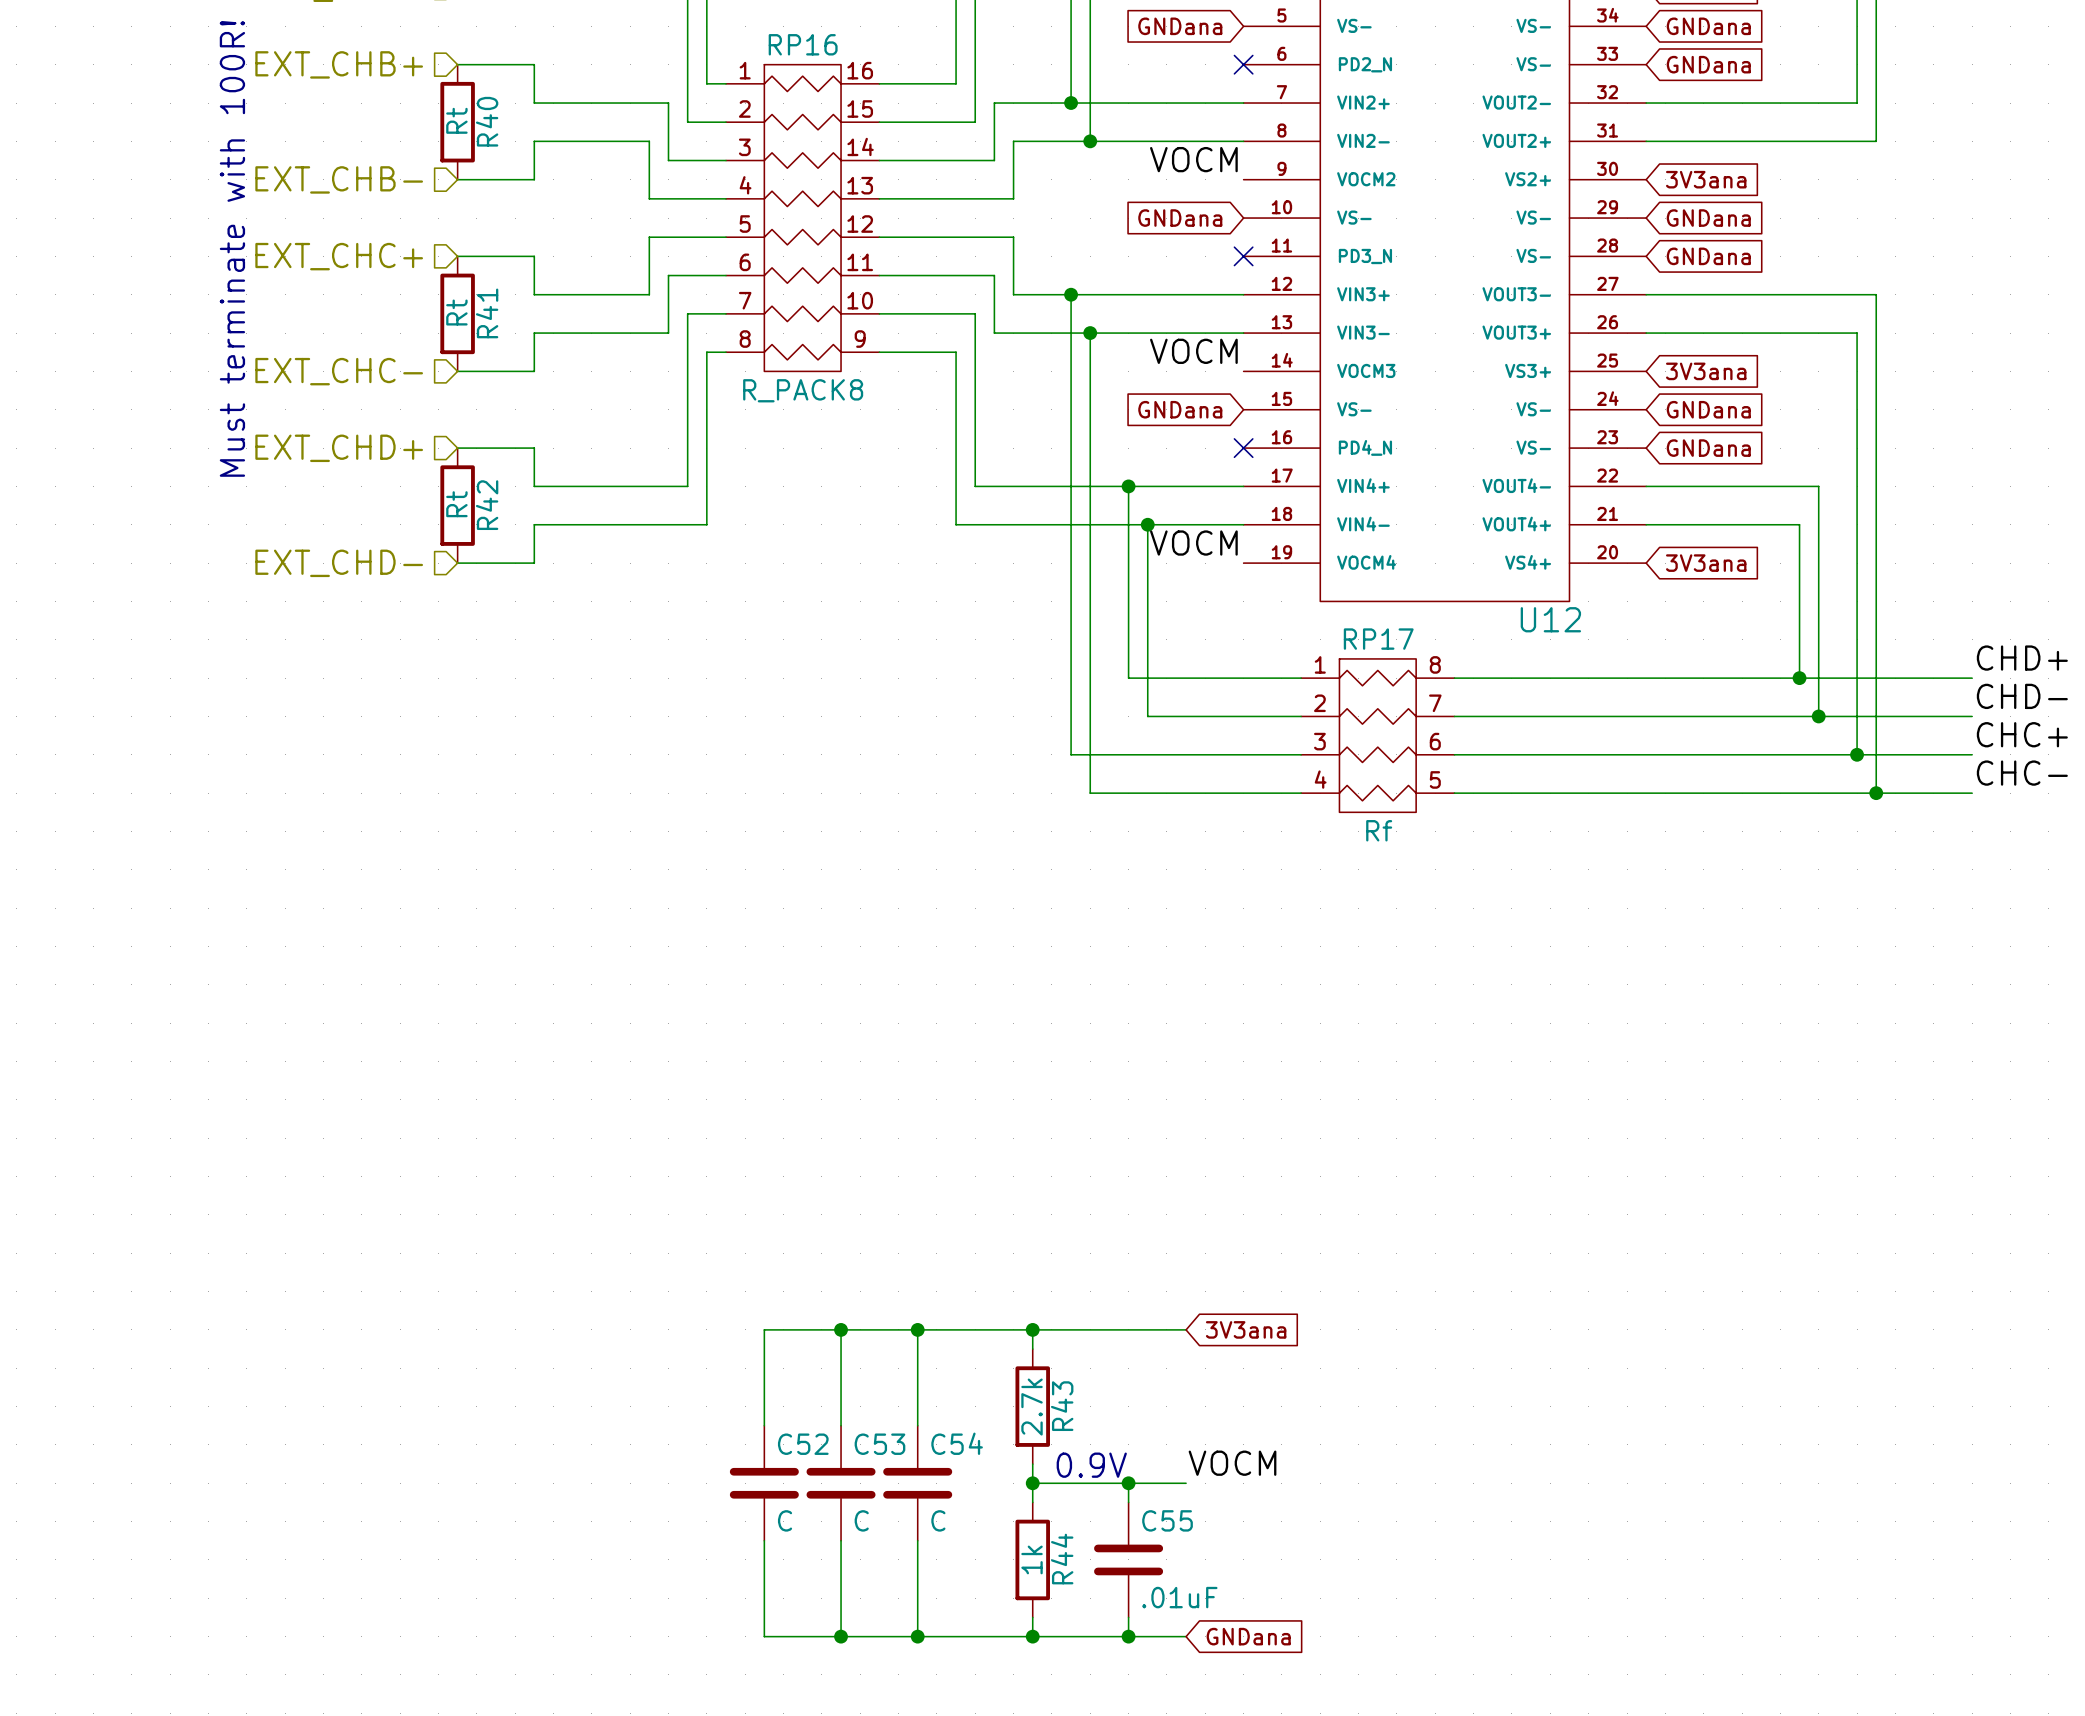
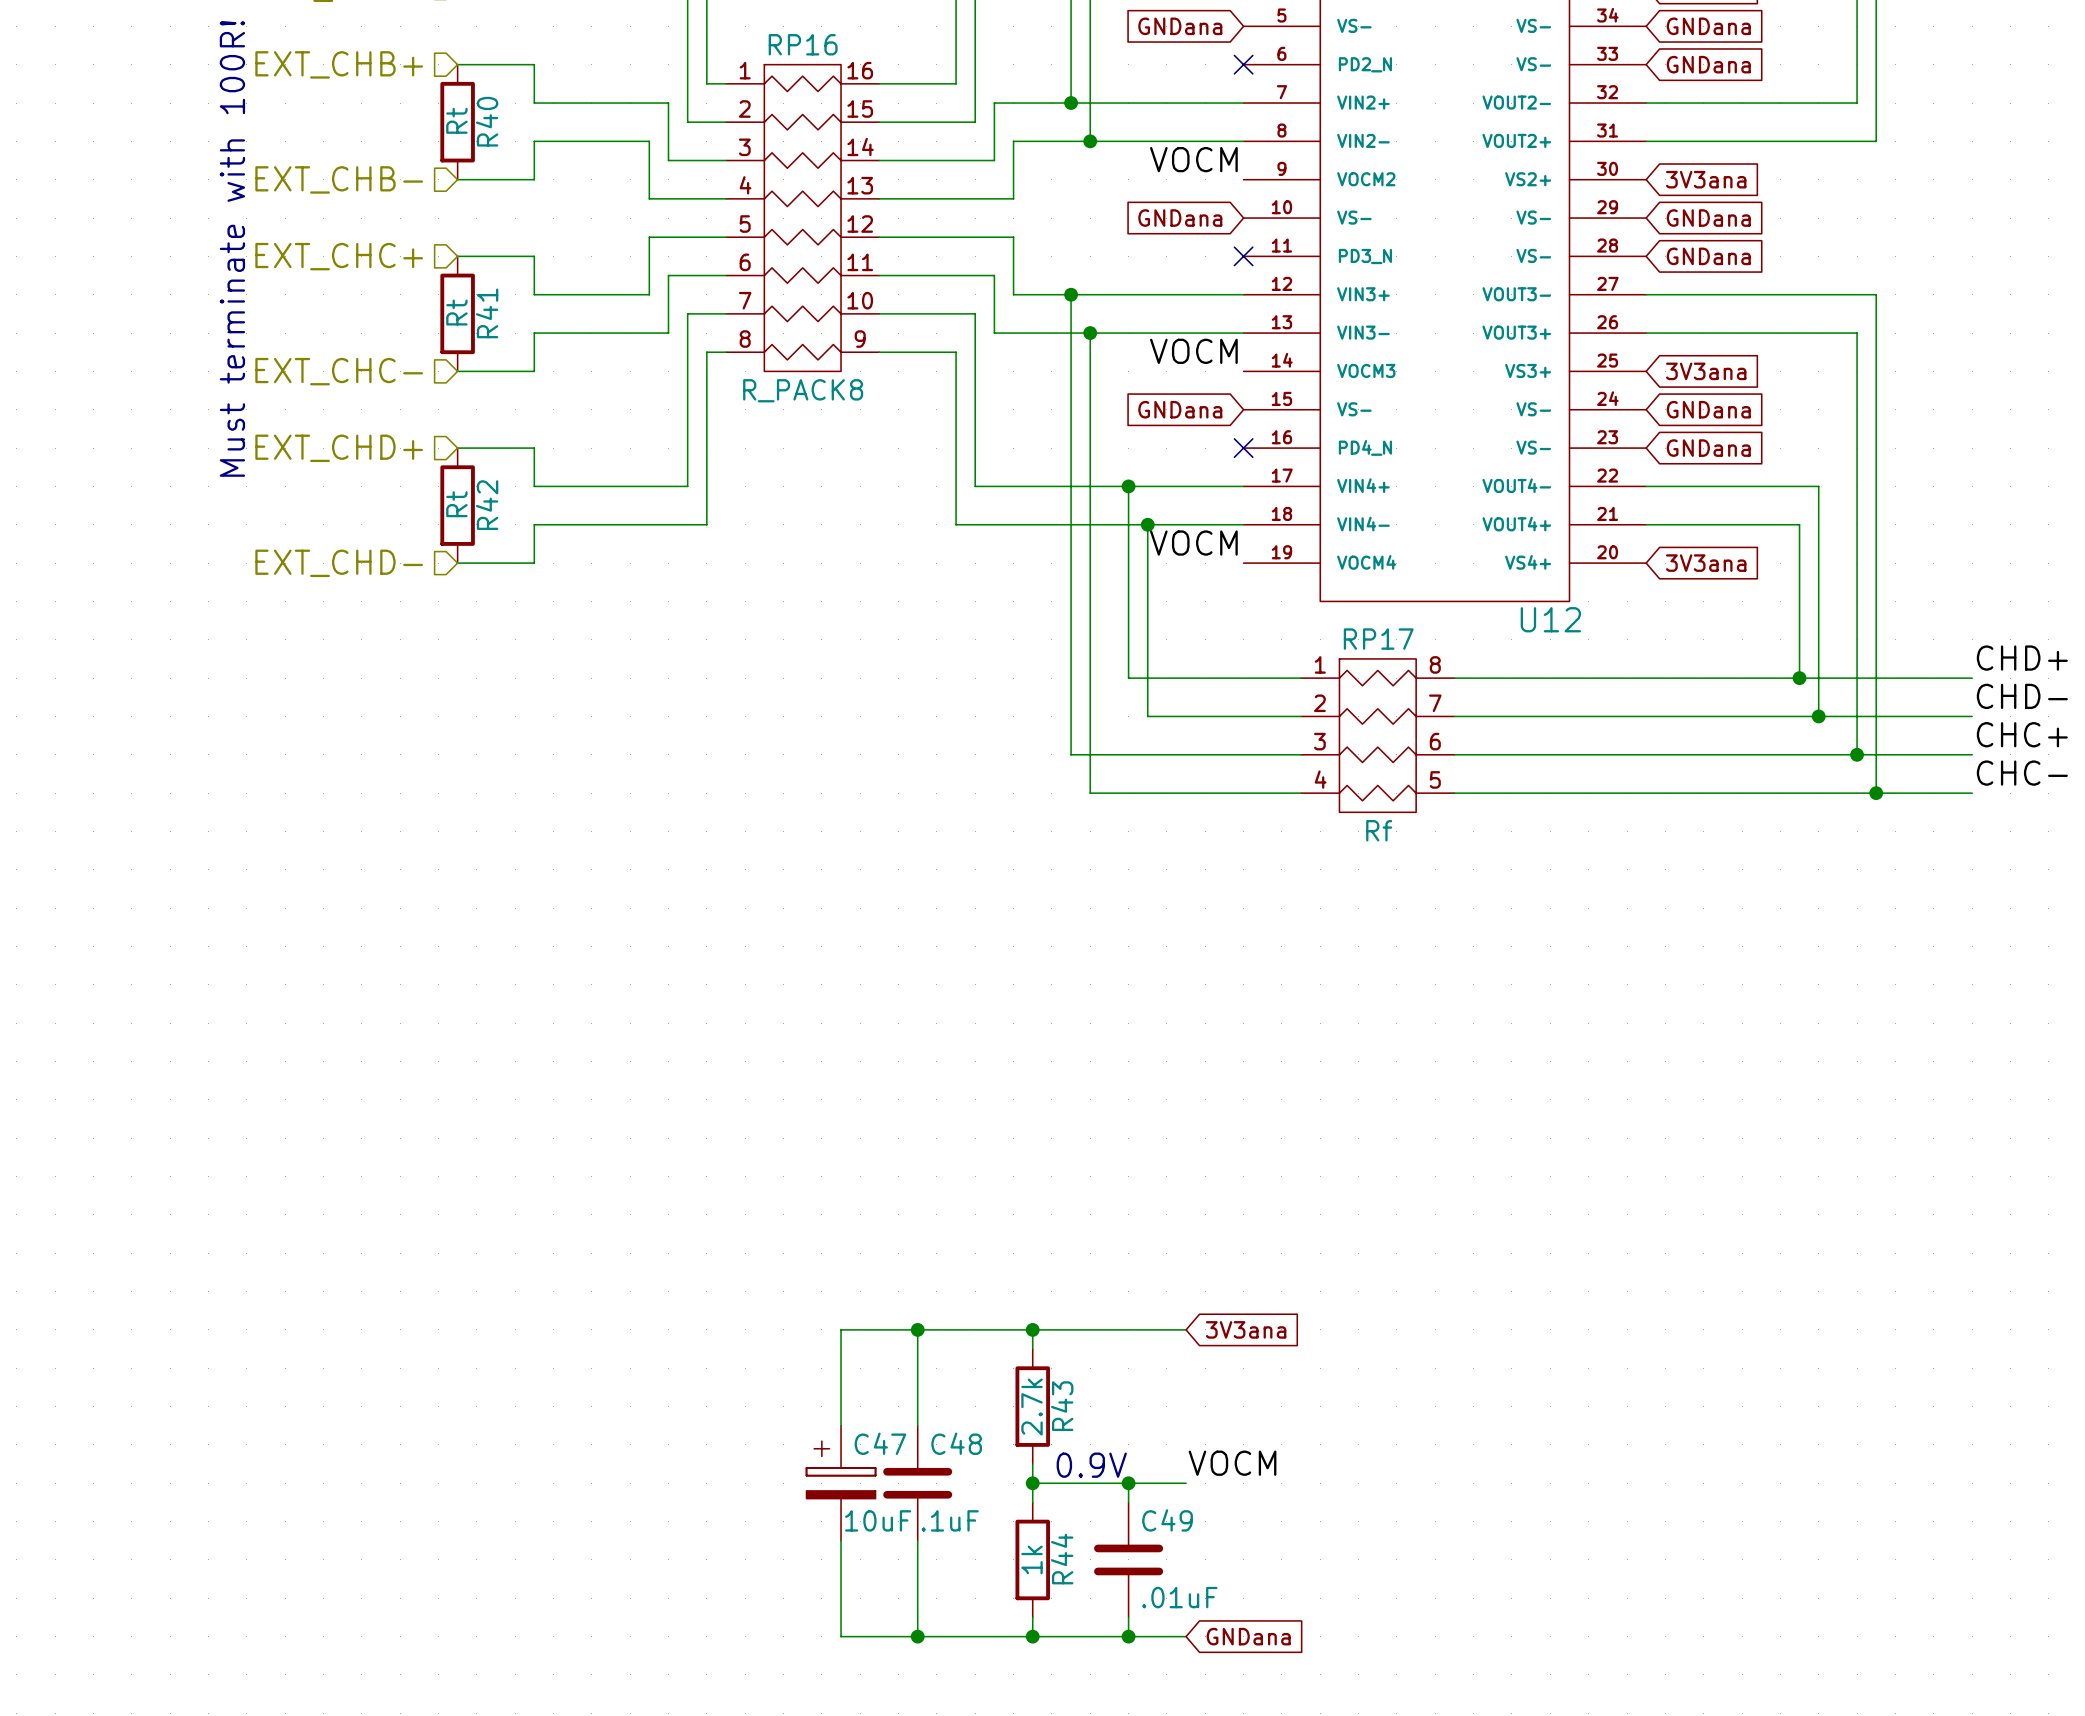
wire: (841, 1329) (764, 1329) (764, 1425) -> none
junction: (841, 1329) -> none
C54 name: C54 (957, 1443) -> C48 (956, 1443)
C52: C (764, 1483) -> none
C53: C (841, 1483) -> none
C47: none -> 10uF (841, 1483)
C54 value: C (938, 1520) -> .1uF (950, 1520)
C55 name: C55 (1167, 1520) -> C49 (1167, 1520)
wire: (764, 1540) (764, 1636) (841, 1636) -> none
junction: (841, 1636) -> none

